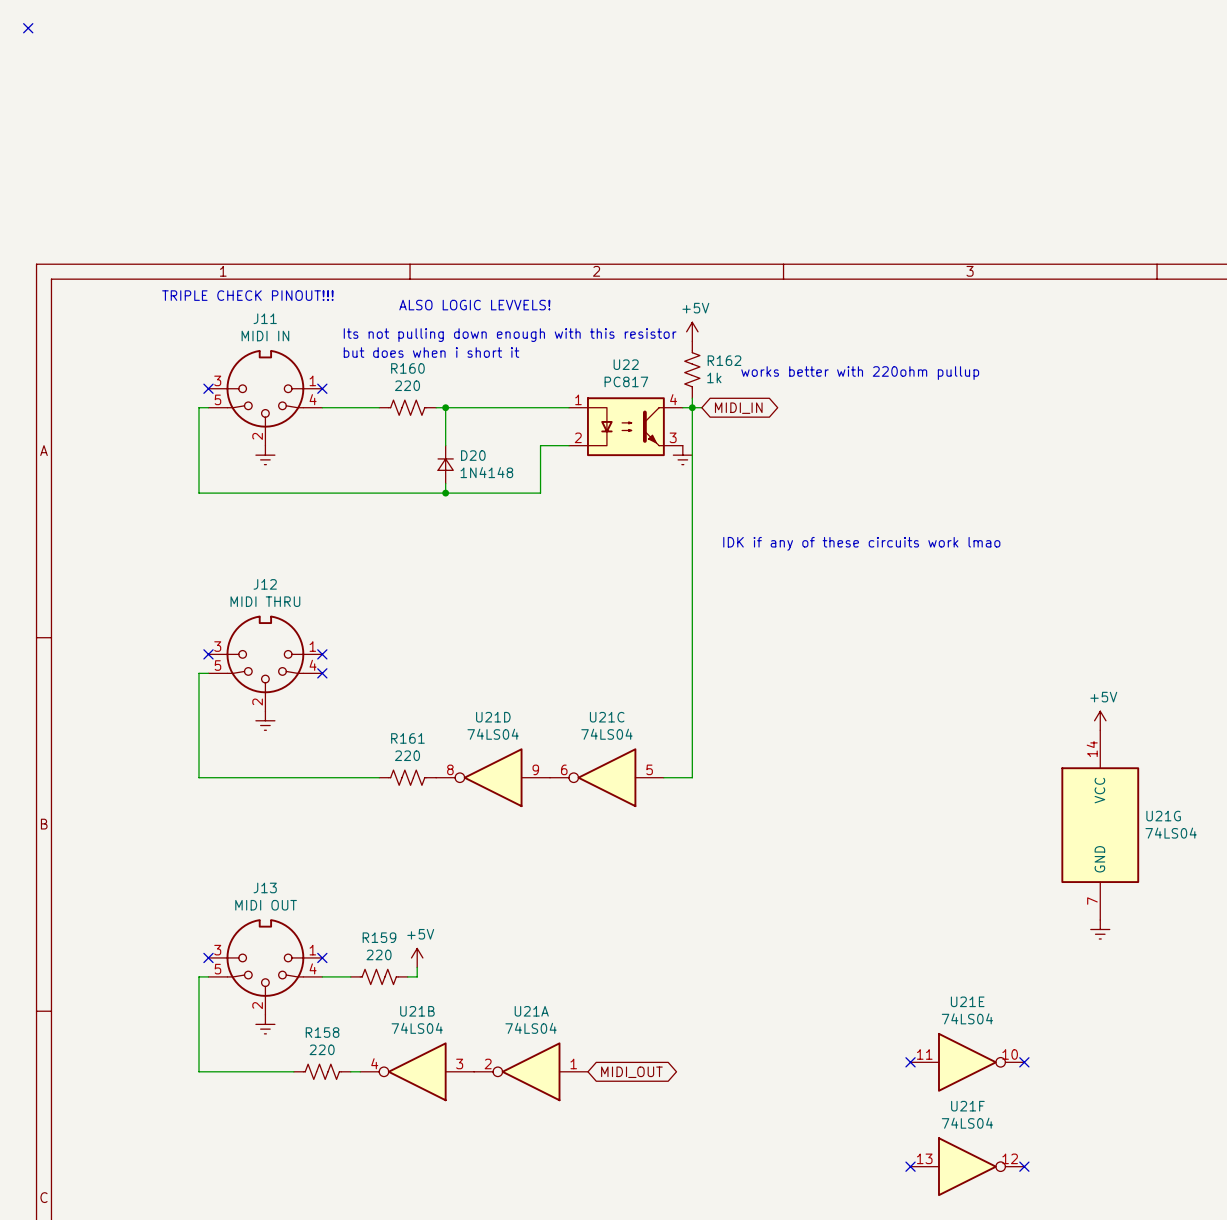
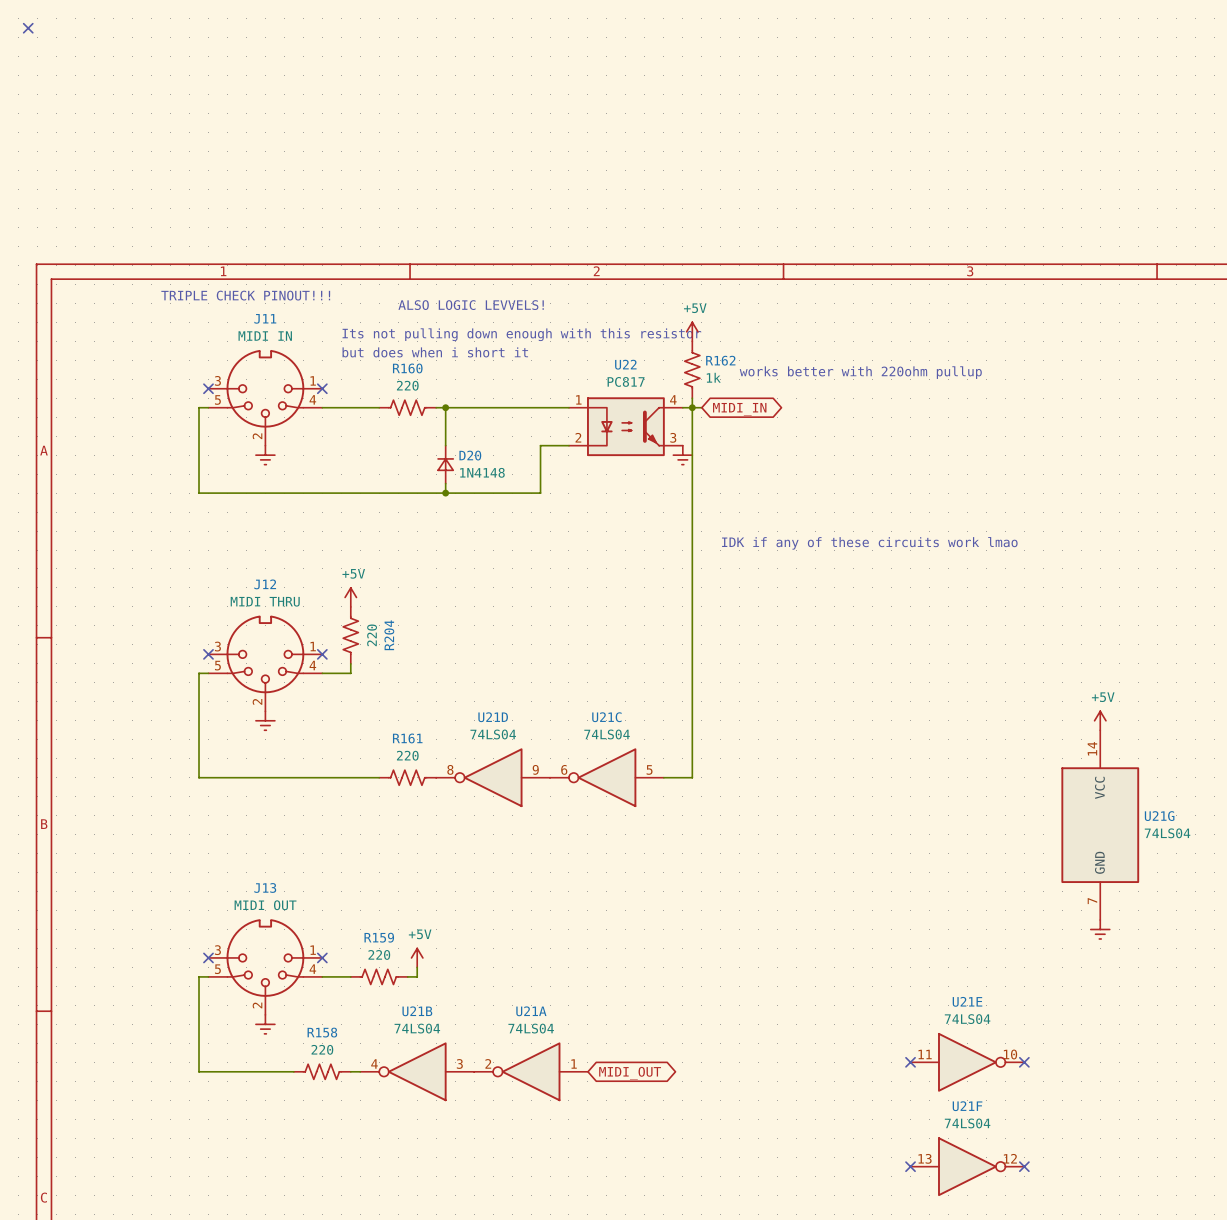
power symbol: none -> +5V (350, 597)
R204: none -> 220 (350, 635)
wire: none -> (350, 663) (350, 673) (322, 673)
no-connect mark: (322, 673) -> none

